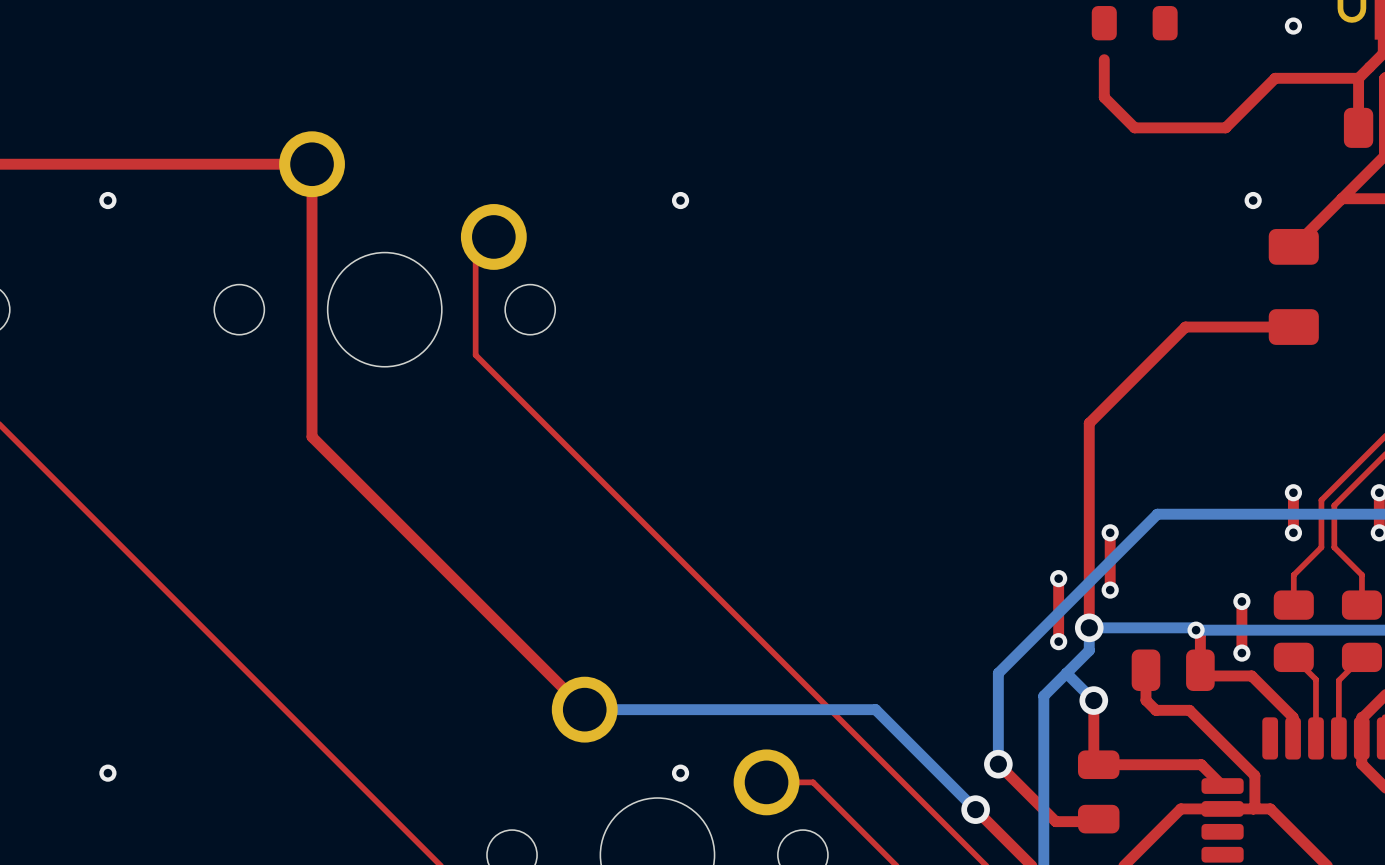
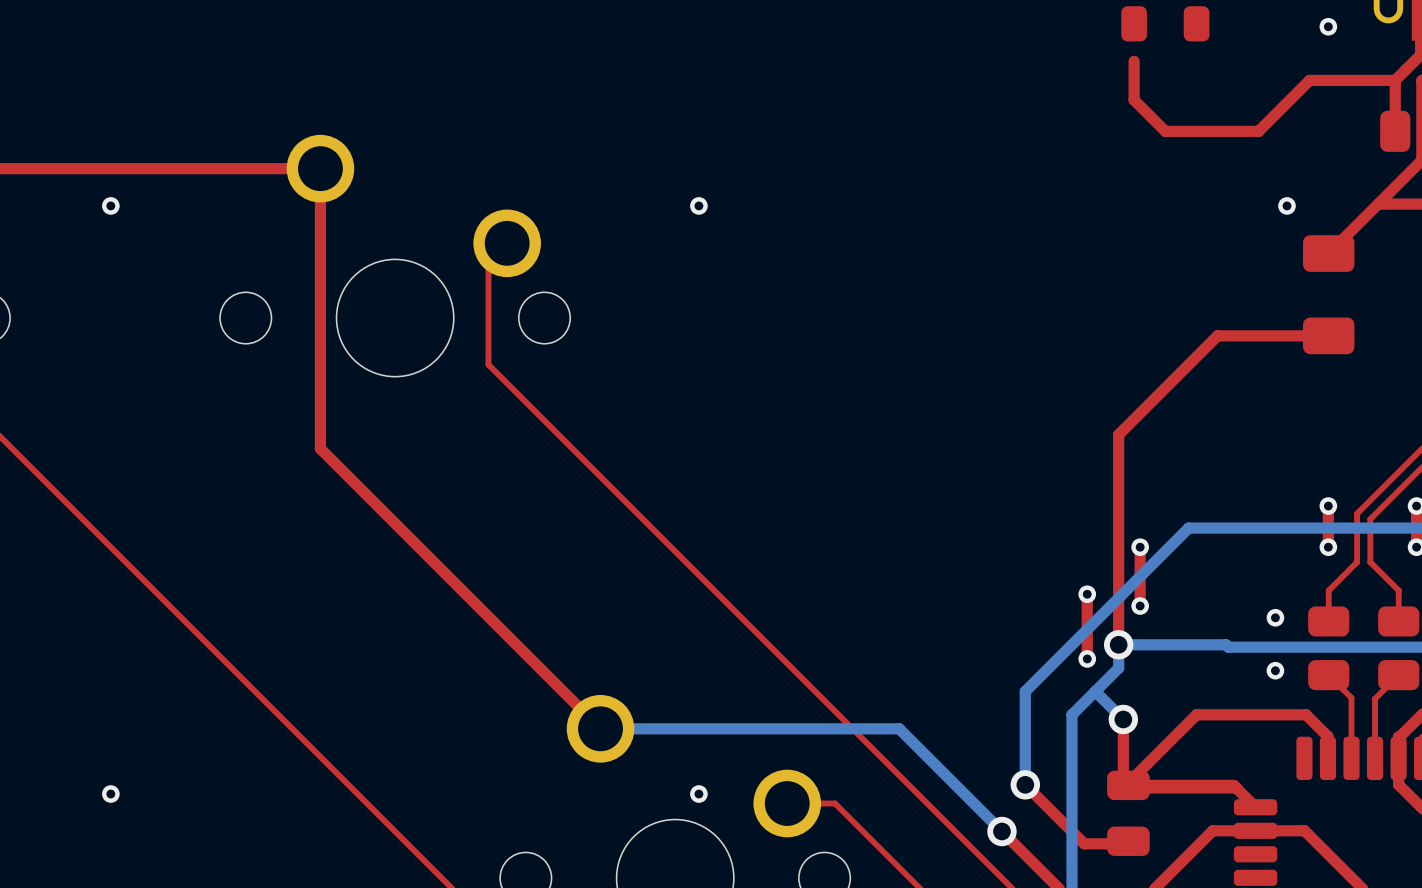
top track: (1241, 601) (1241, 653) -> none
top track: (1196, 630) (1200, 634) (1200, 675) (1251, 675) (1271, 696) -> (1236, 787) (1123, 787) (1196, 714) (1306, 714)
via: (1196, 630) -> none
part: (1173, 670) -> none
top track: (1145, 675) (1145, 700) (1156, 710) (1189, 710) (1254, 775) (1253, 808) -> none

